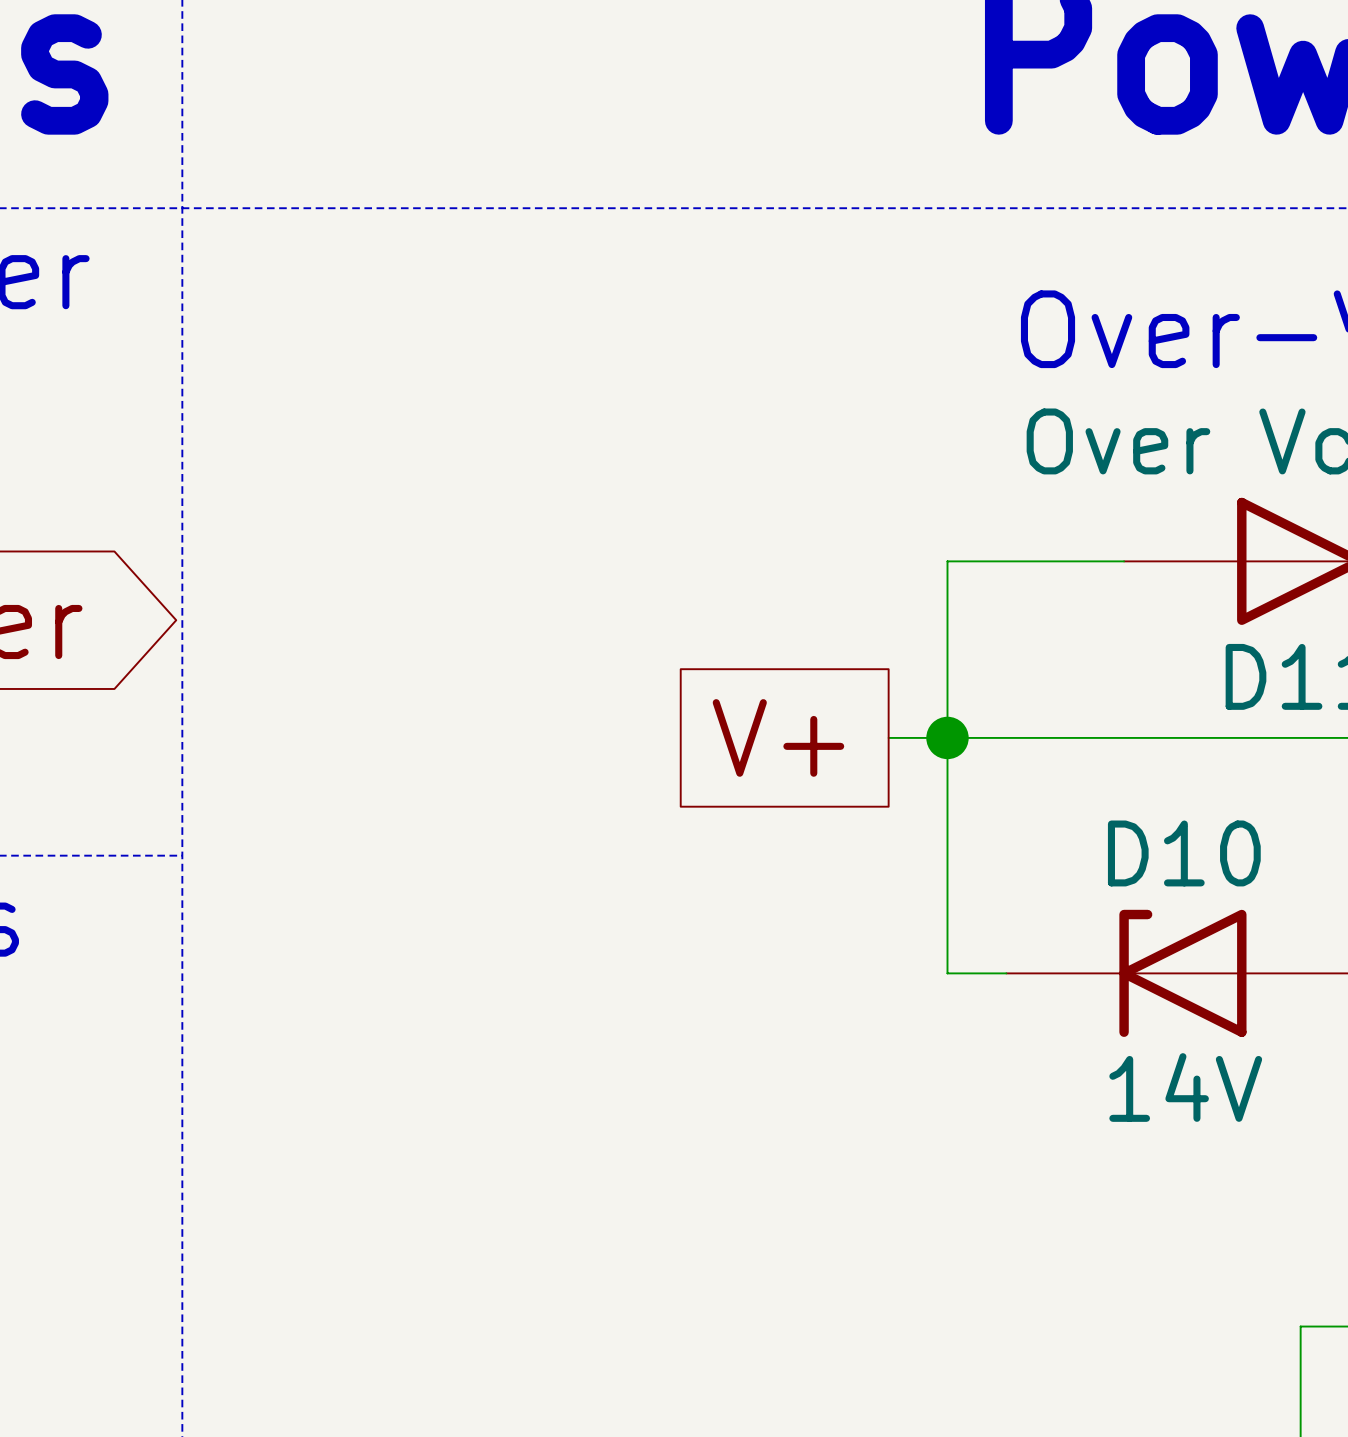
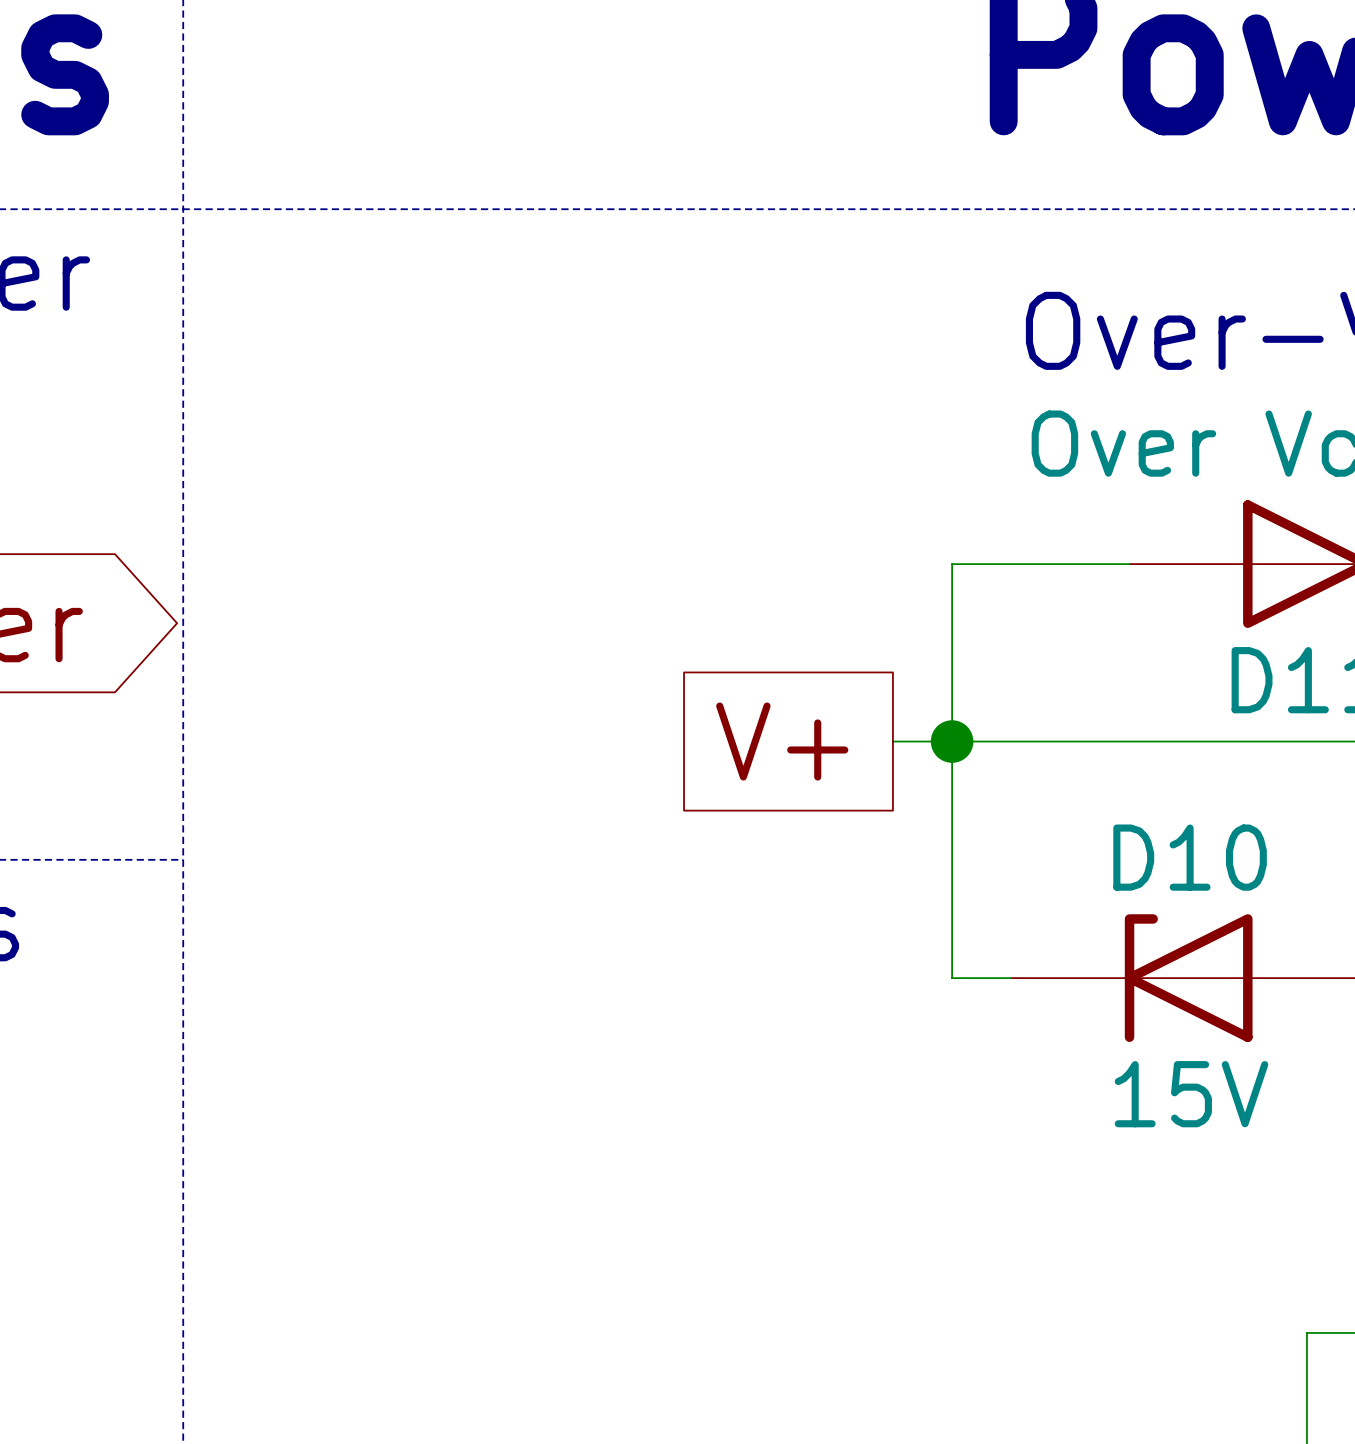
D10 value: 14V (1185, 1087) -> 15V (1191, 1094)

